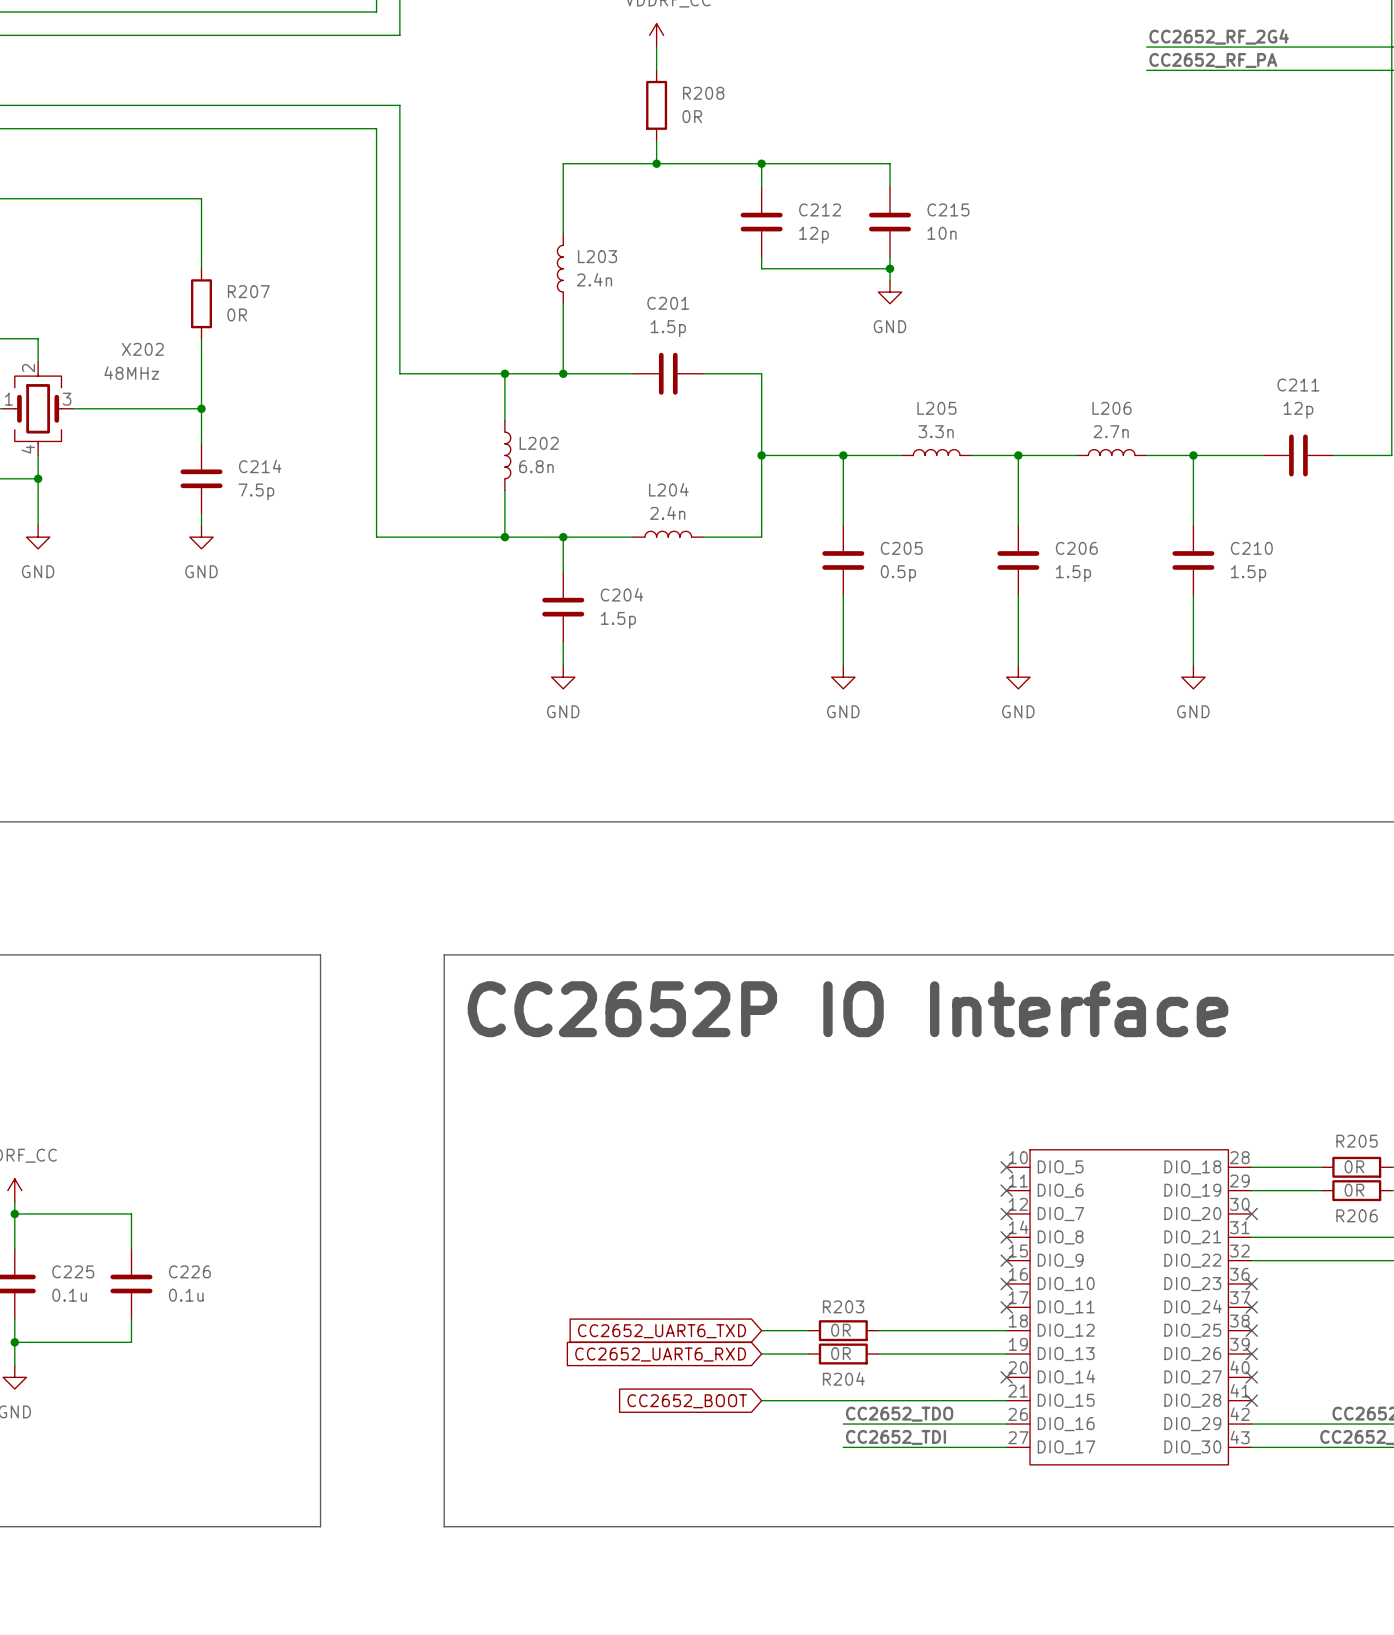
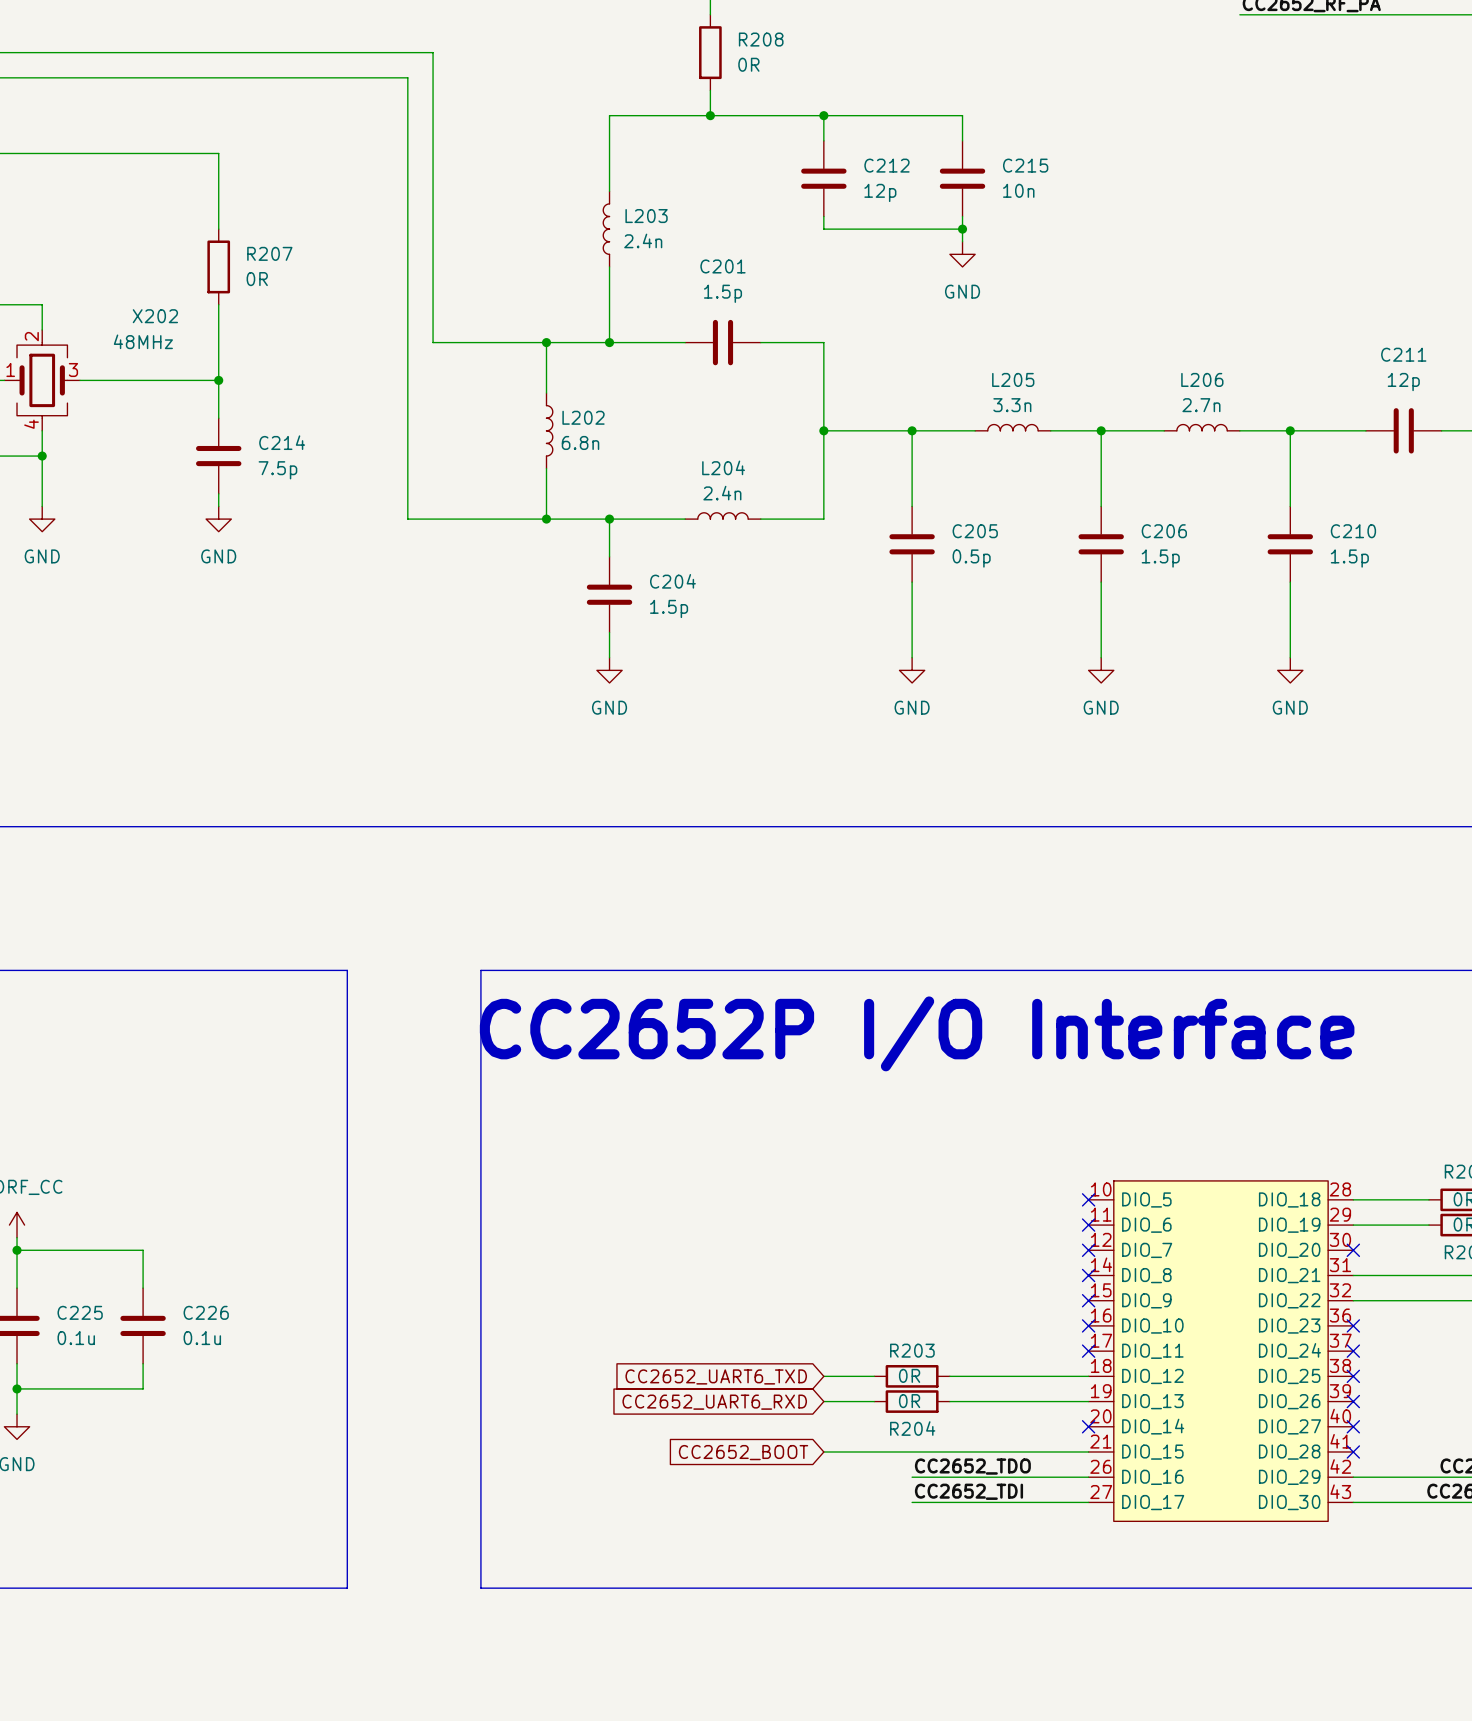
text: CC2652P IO Interface (847, 1009) -> CC2652P I/O Interface (917, 1033)

